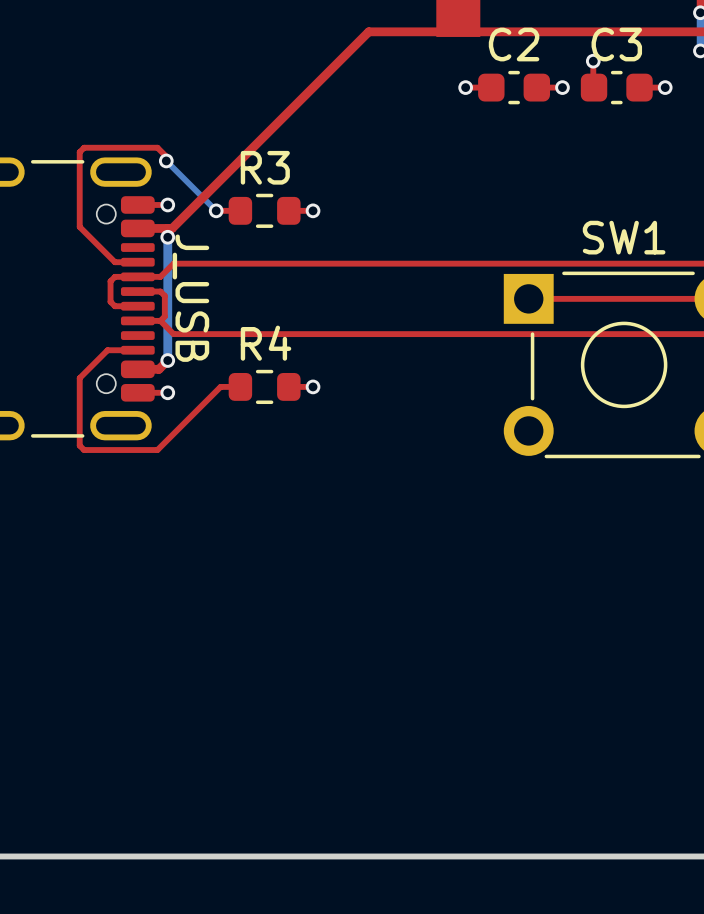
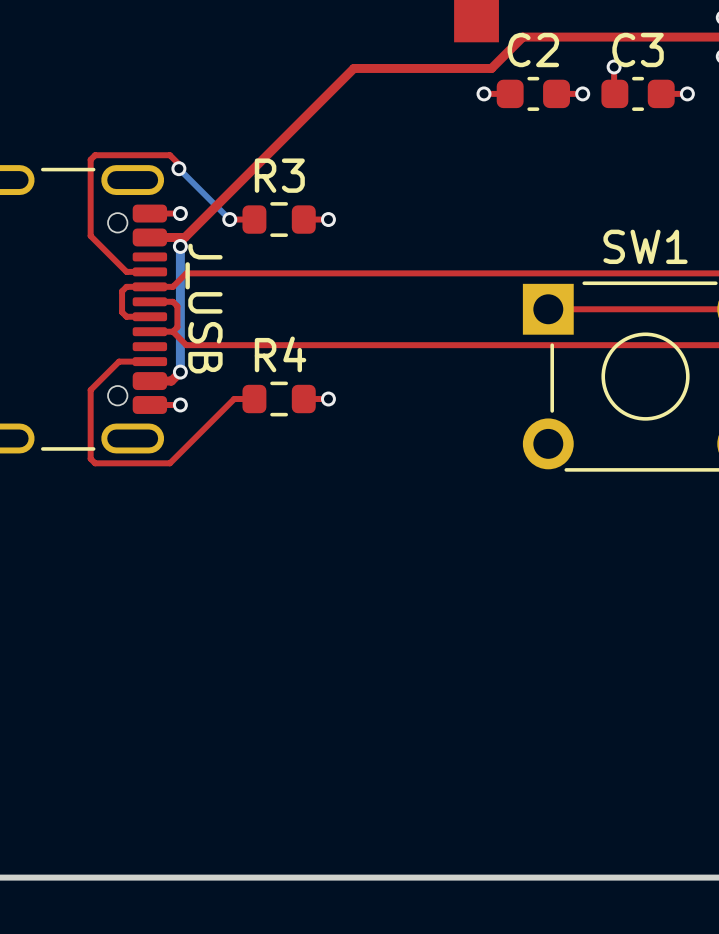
top track: (503, 31) (368, 31) (337, 62) -> (522, 37) (491, 68) (353, 68)

